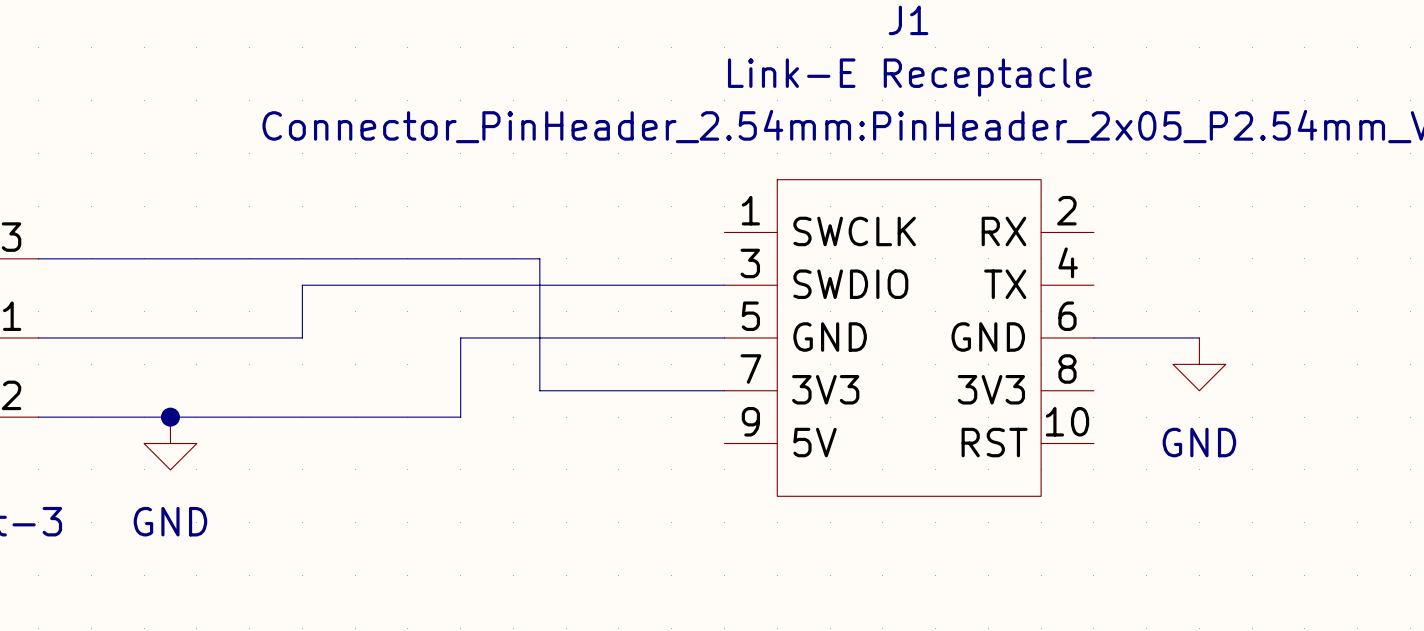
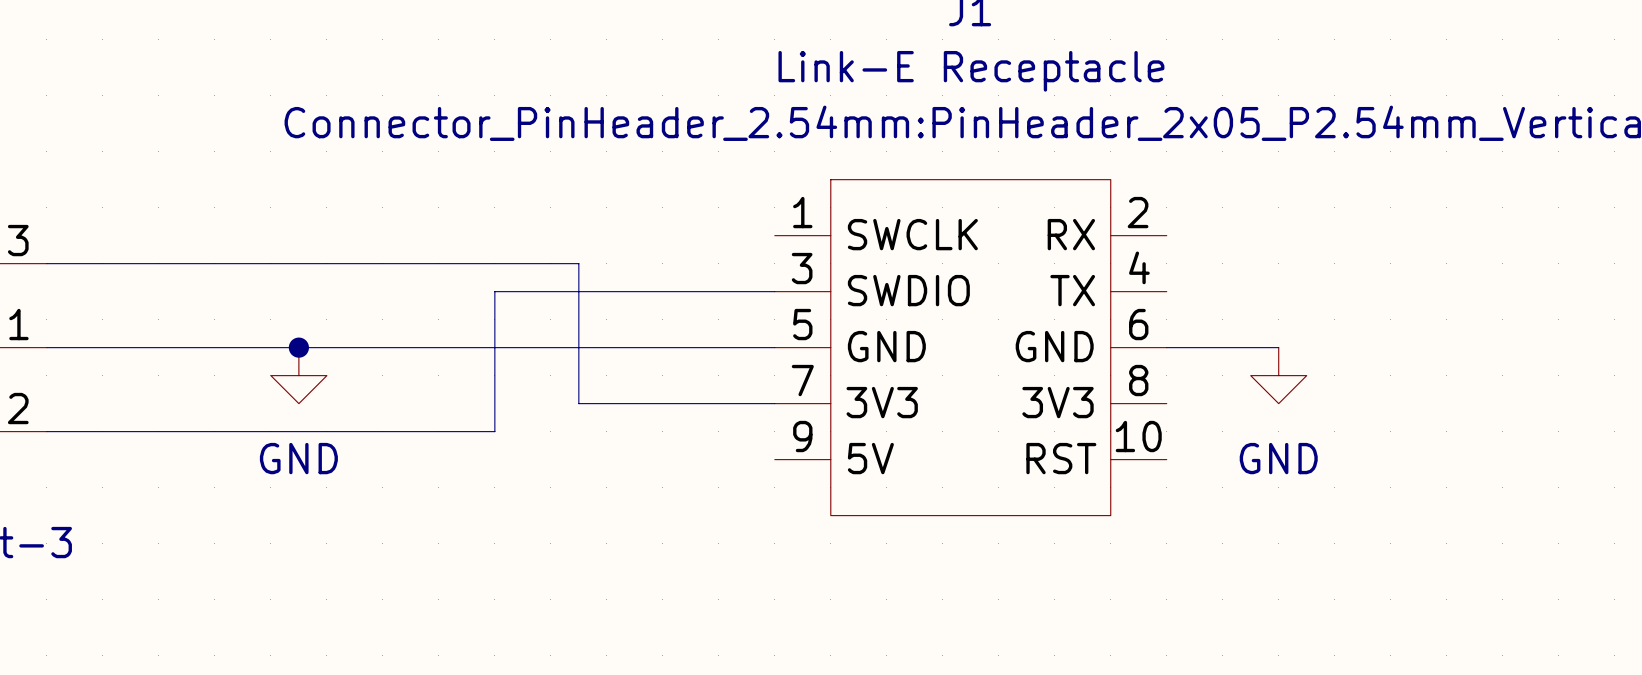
wire: (460, 285) (302, 285) (302, 337) -> (494, 291) (494, 347) (326, 347)
junction: none -> (298, 347)
junction: (170, 417) -> none
power symbol position: GND (170, 443) -> GND (298, 375)

